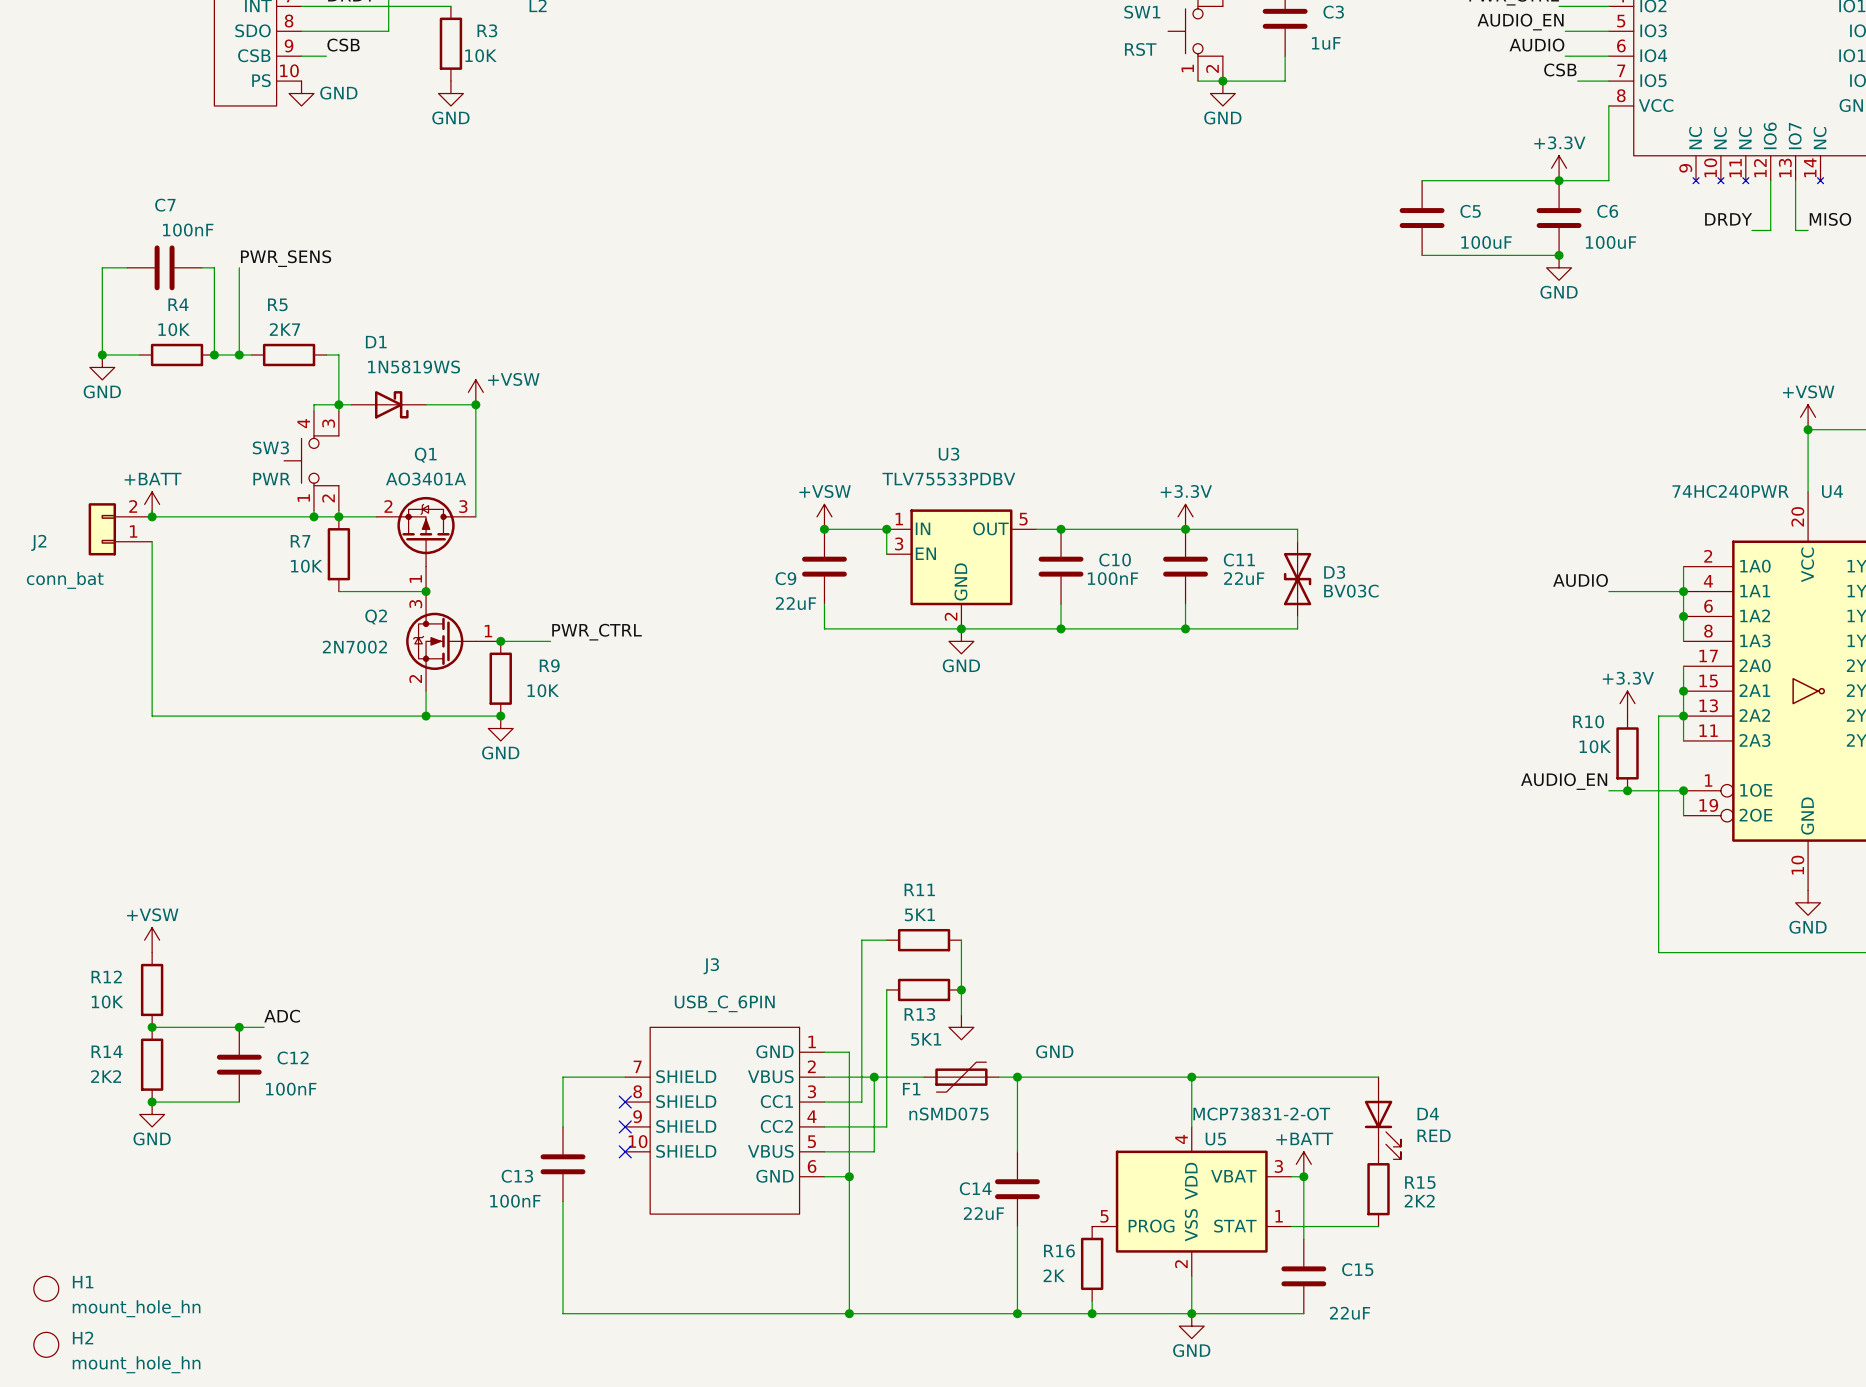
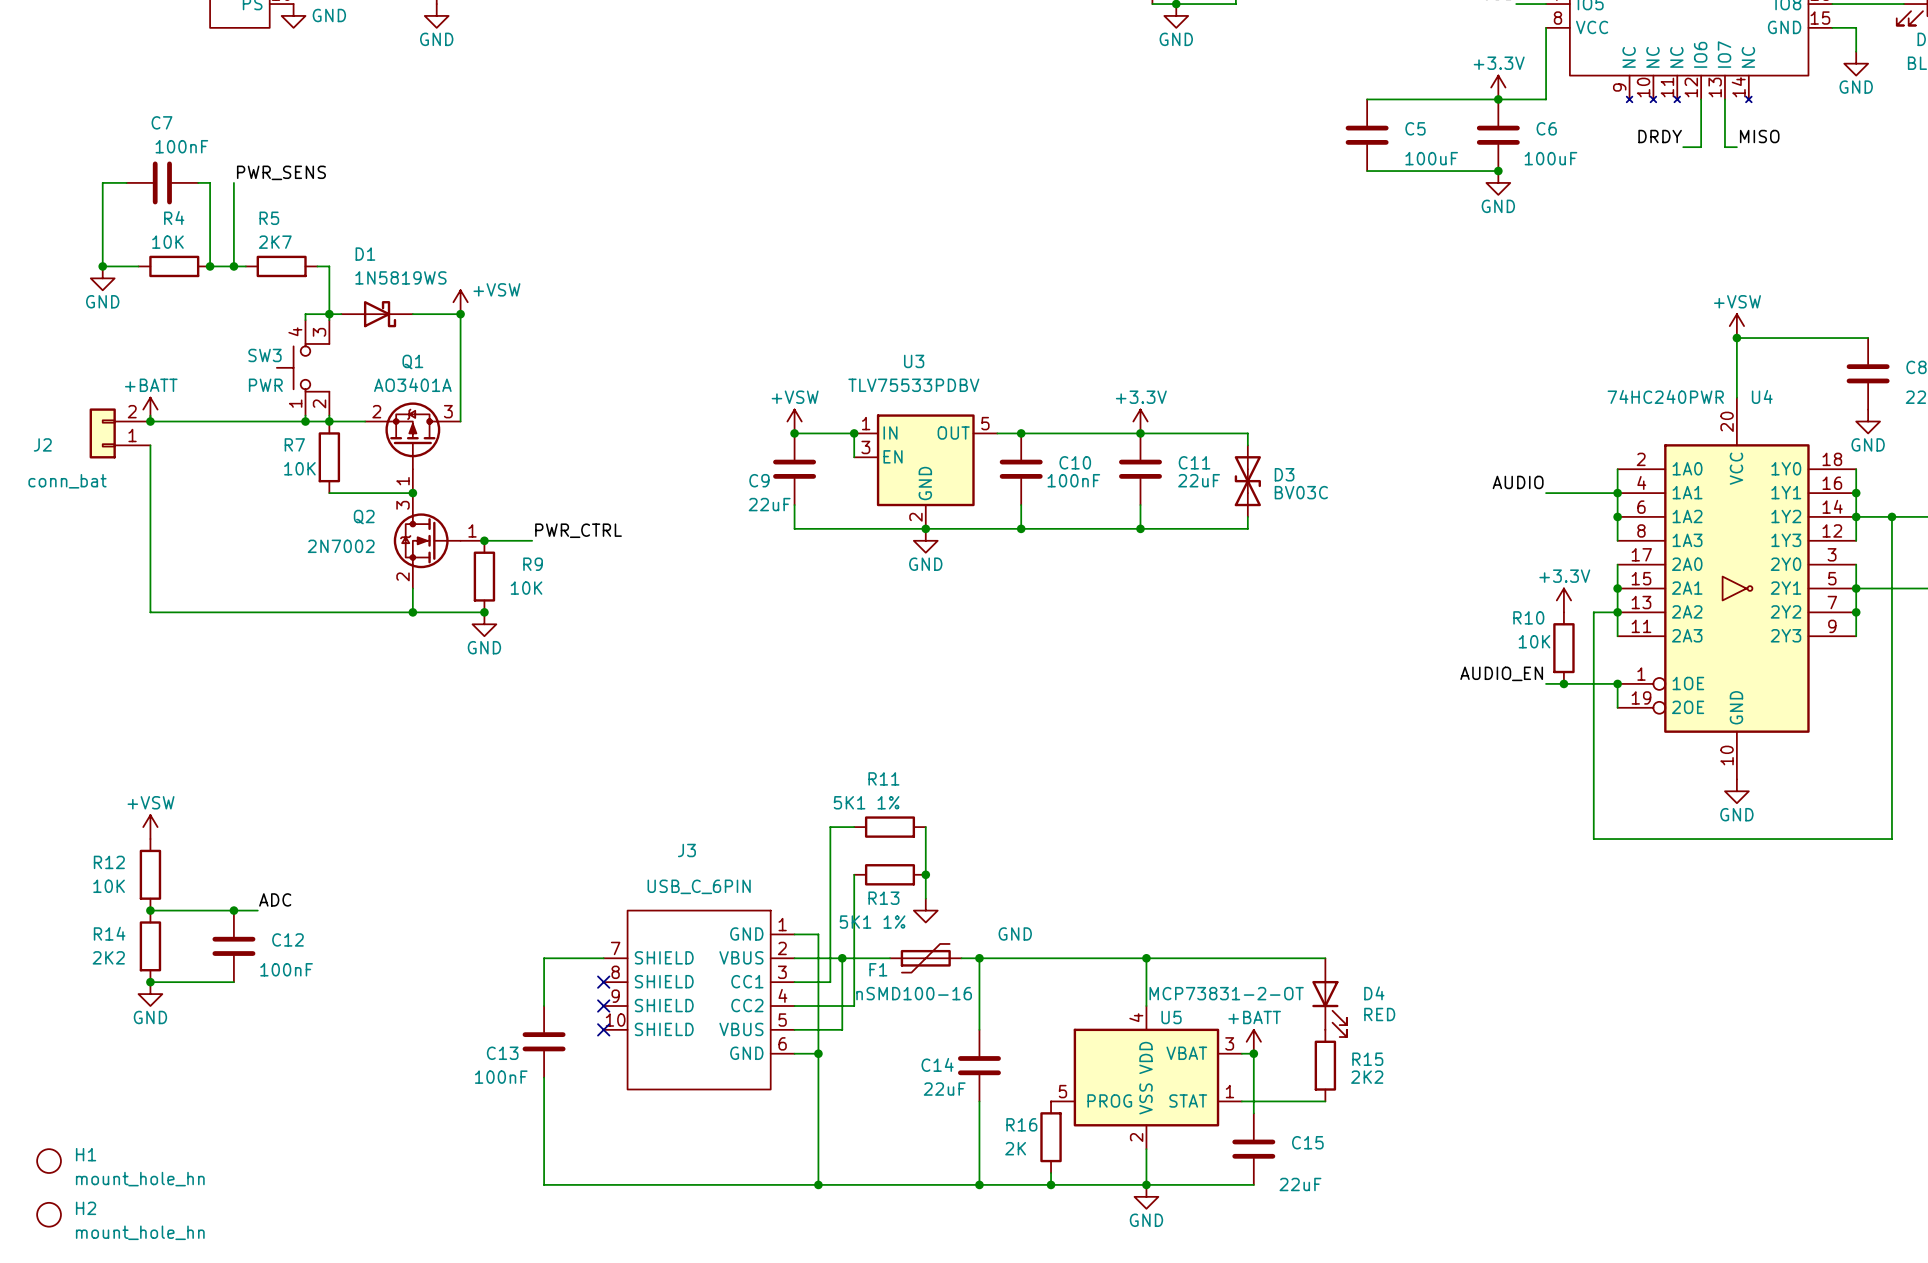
R11 value: 5K1 (919, 914) -> 5K1 1% (866, 802)
R13 value: 5K1 (926, 1039) -> 5K1 1% (872, 922)
F1 value: nSMD075 (949, 1114) -> nSMD100-16 (914, 993)

